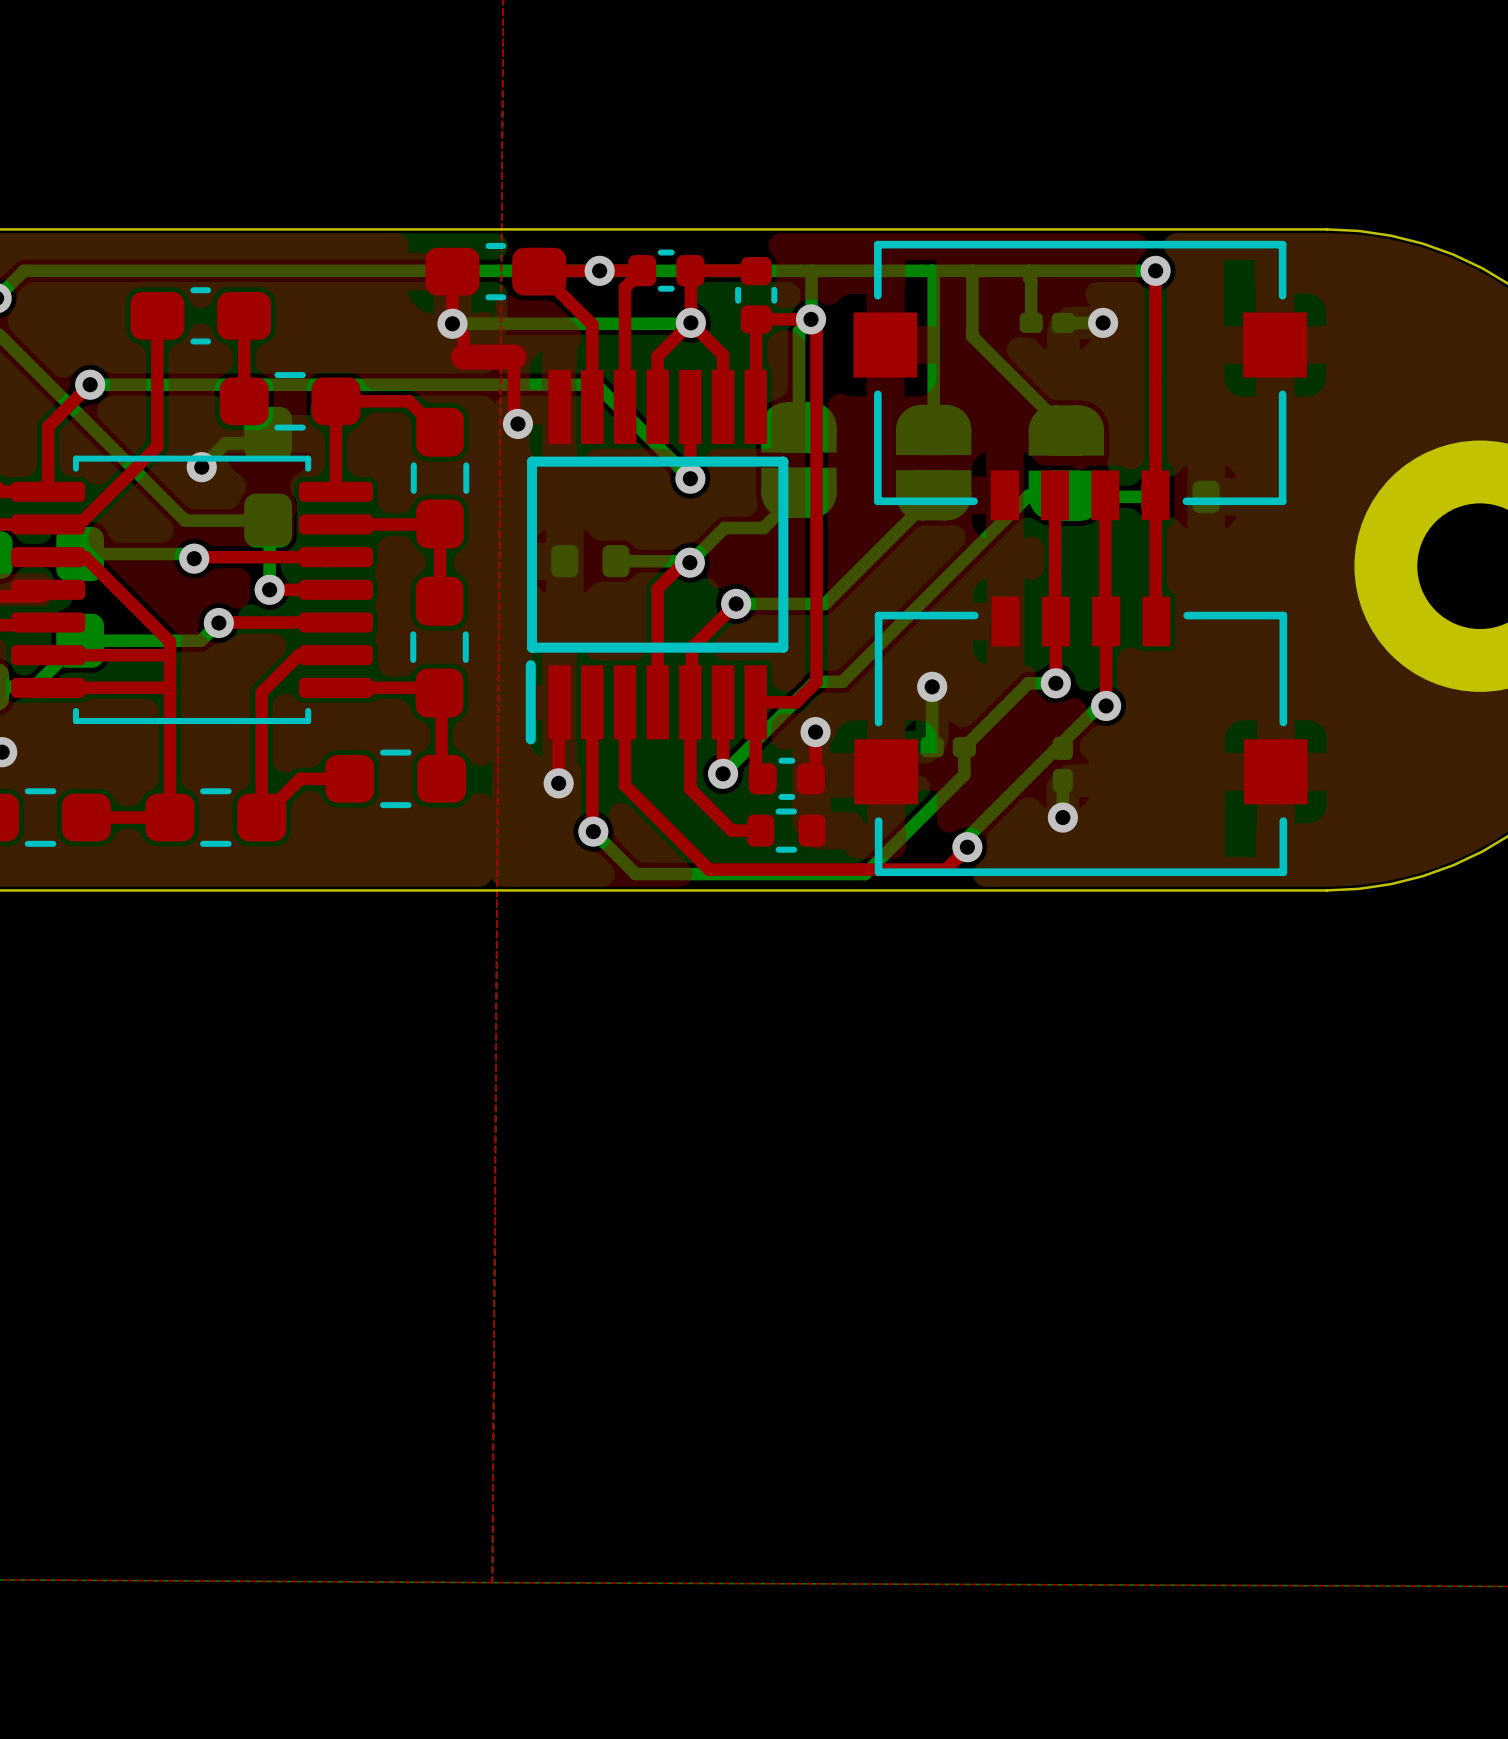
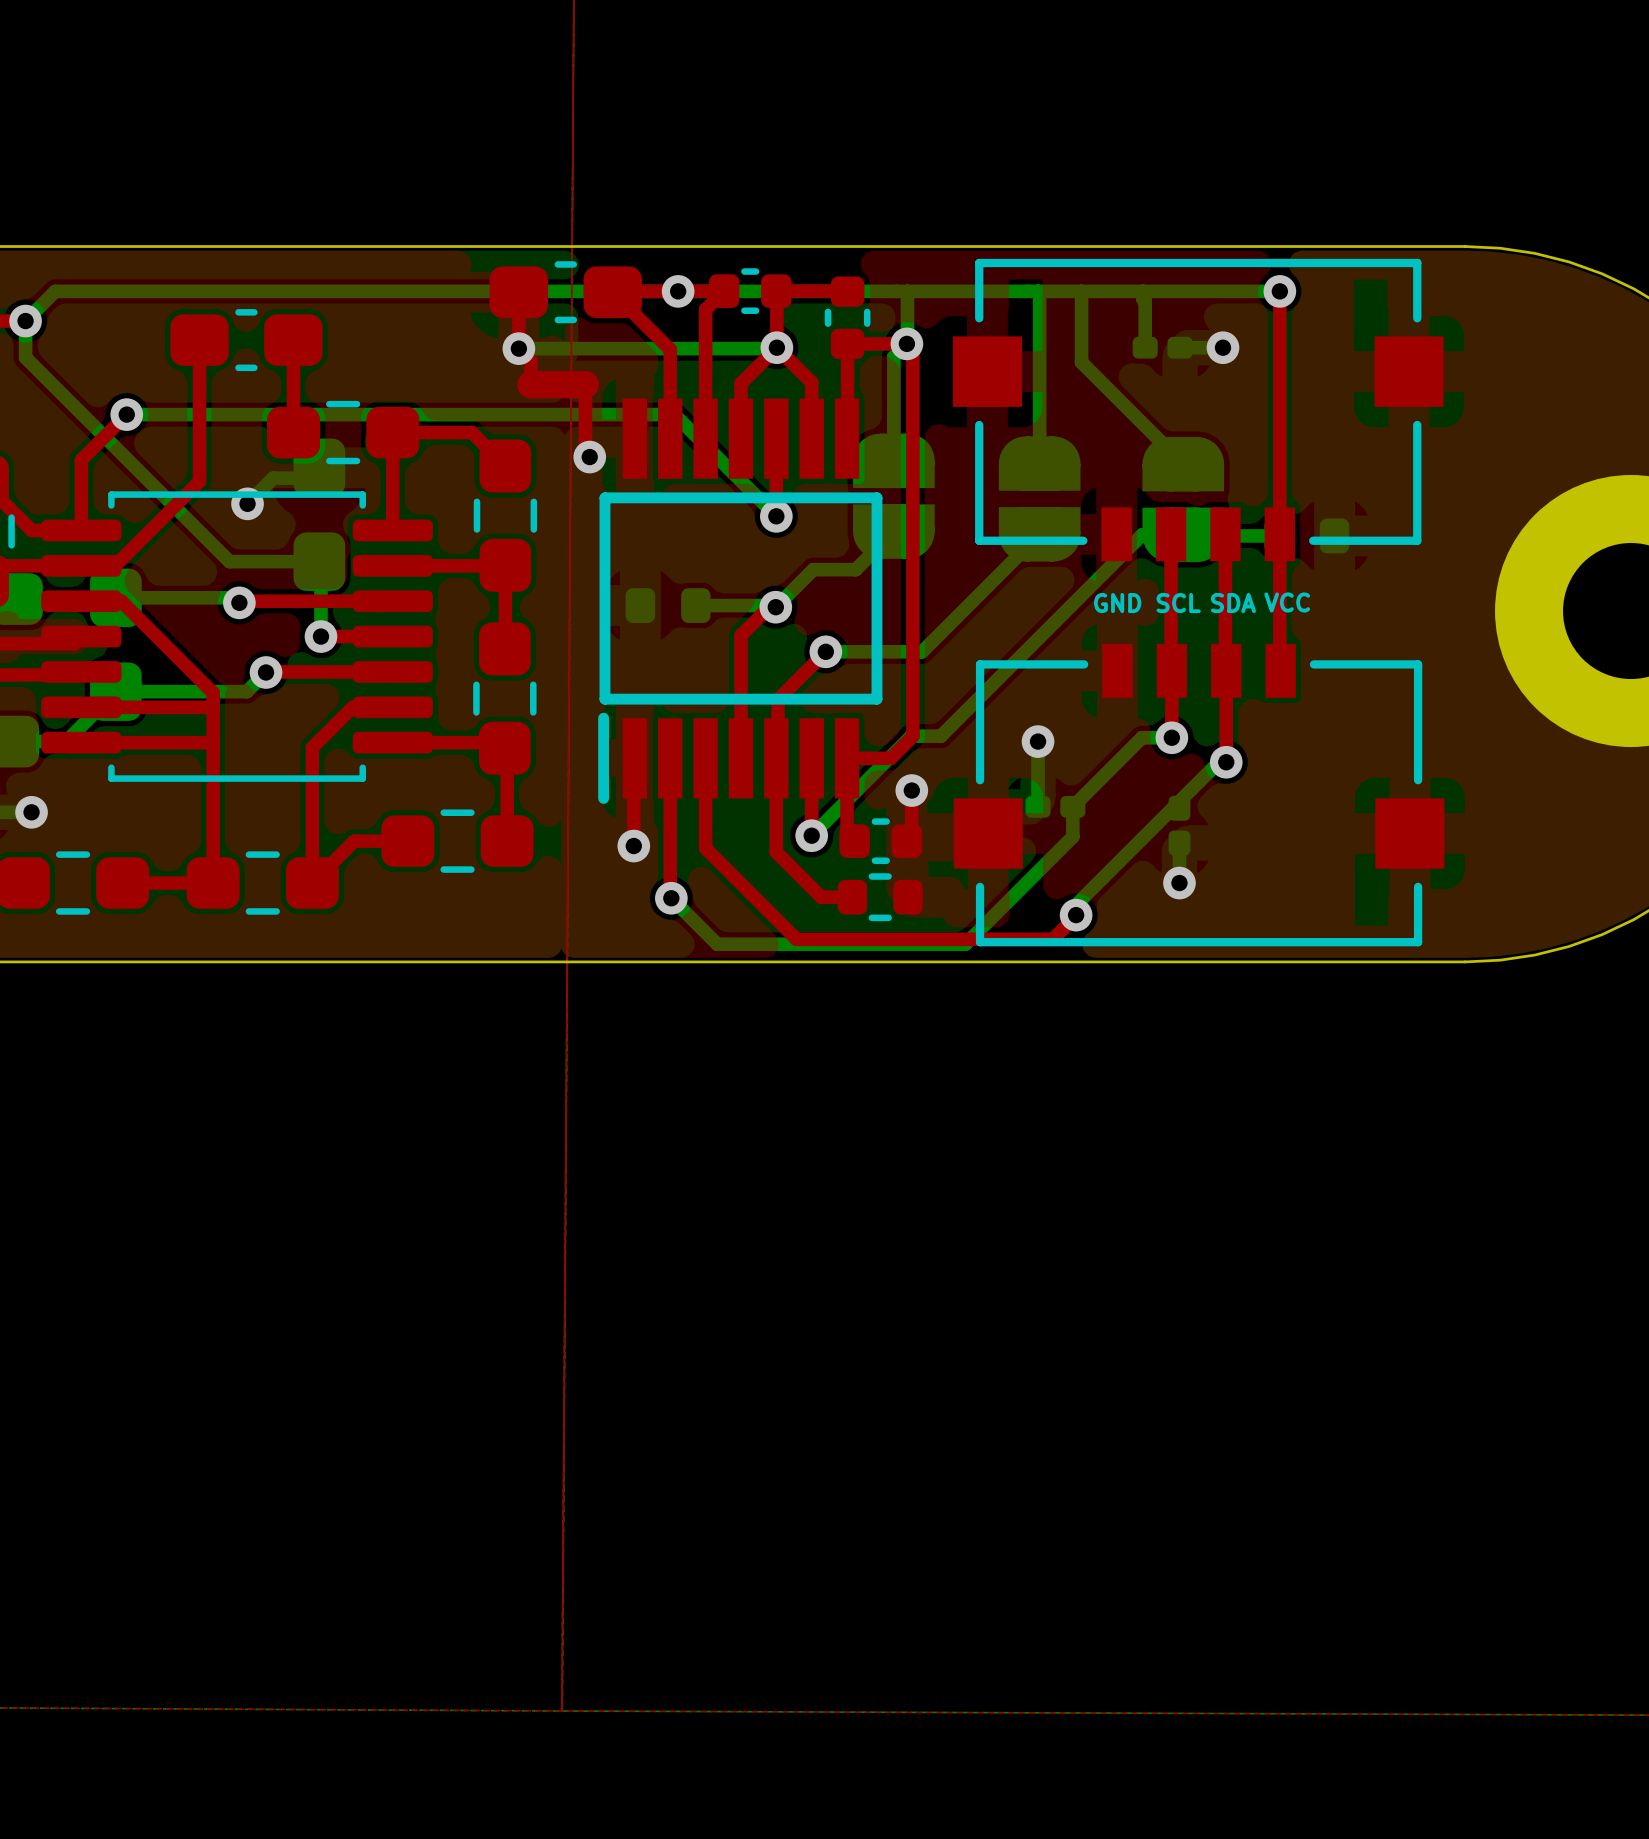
text: none -> GND (1117, 603)
text: none -> SCL (1178, 603)
text: none -> SDA (1233, 603)
text: none -> VCC (1287, 602)

